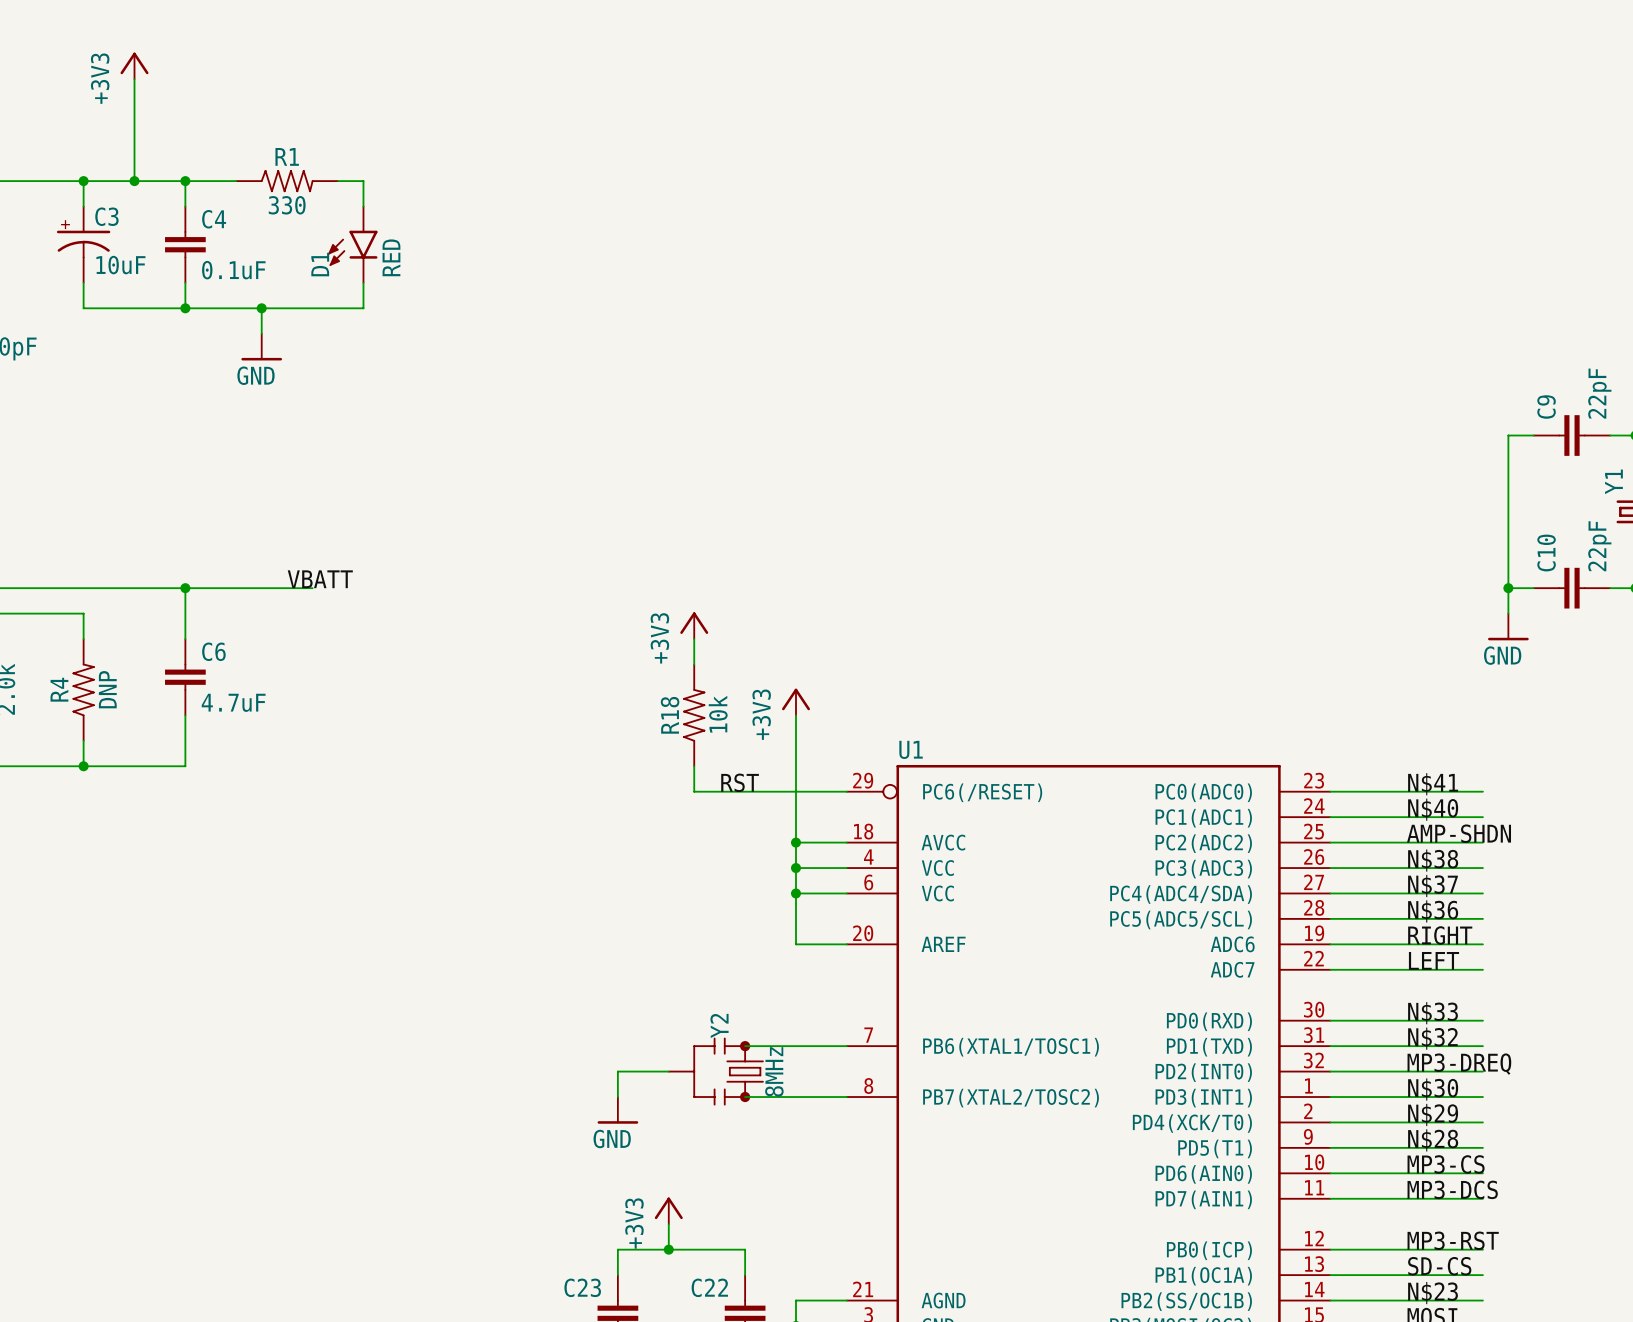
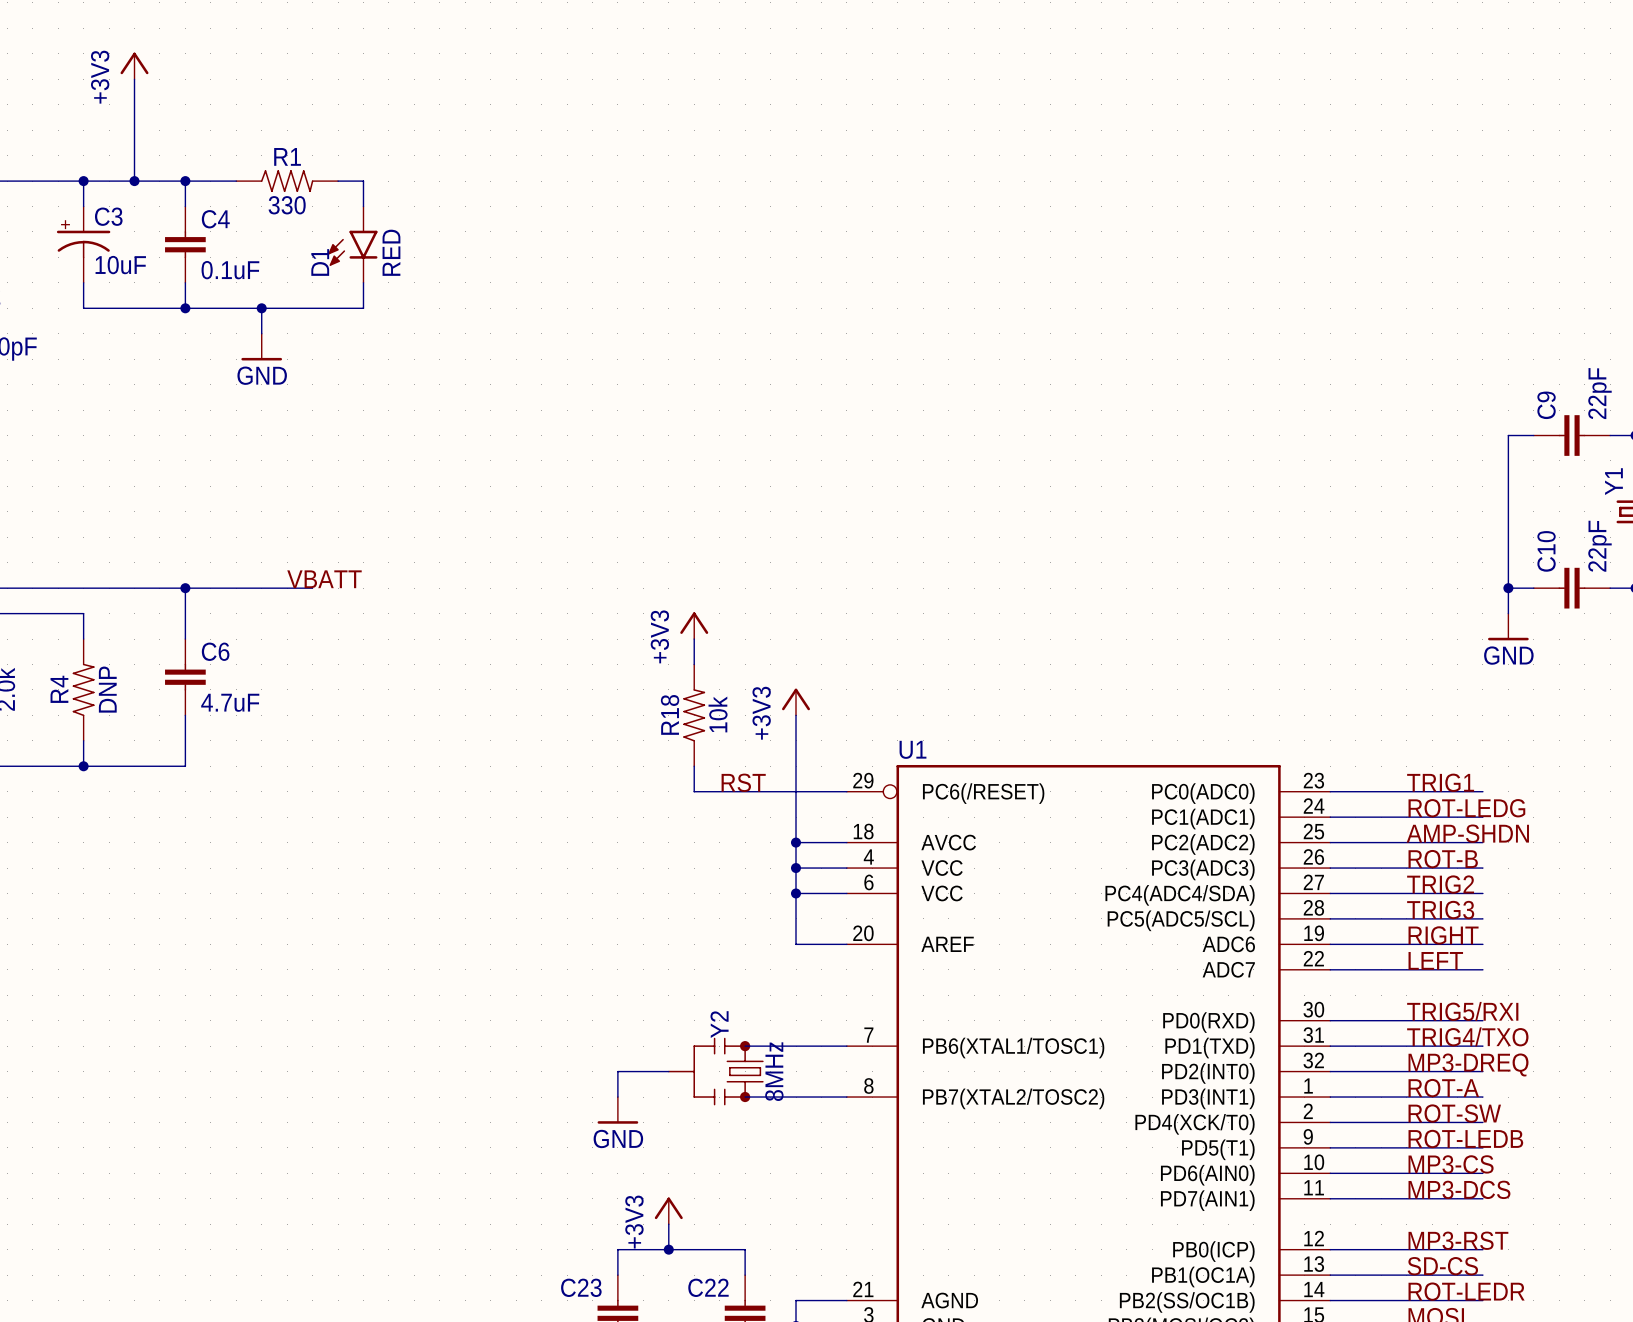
label: N$41 (1433, 784) -> TRIG1 (1440, 782)
label: N$40 (1433, 809) -> ROT-LEDG (1466, 808)
label: N$38 (1433, 860) -> ROT-B (1443, 859)
label: N$37 (1433, 885) -> TRIG2 (1440, 884)
label: N$36 (1433, 911) -> TRIG3 (1440, 910)
label: N$33 (1433, 1013) -> TRIG5/RXI (1462, 1011)
label: N$32 (1432, 1038) -> TRIG4/TXO (1467, 1036)
label: N$30 (1433, 1089) -> ROT-A (1443, 1088)
label: N$29 (1433, 1114) -> ROT-SW (1454, 1113)
label: N$28 (1433, 1140) -> ROT-LEDB (1465, 1138)
label: N$23 (1433, 1293) -> ROT-LEDR (1466, 1291)

